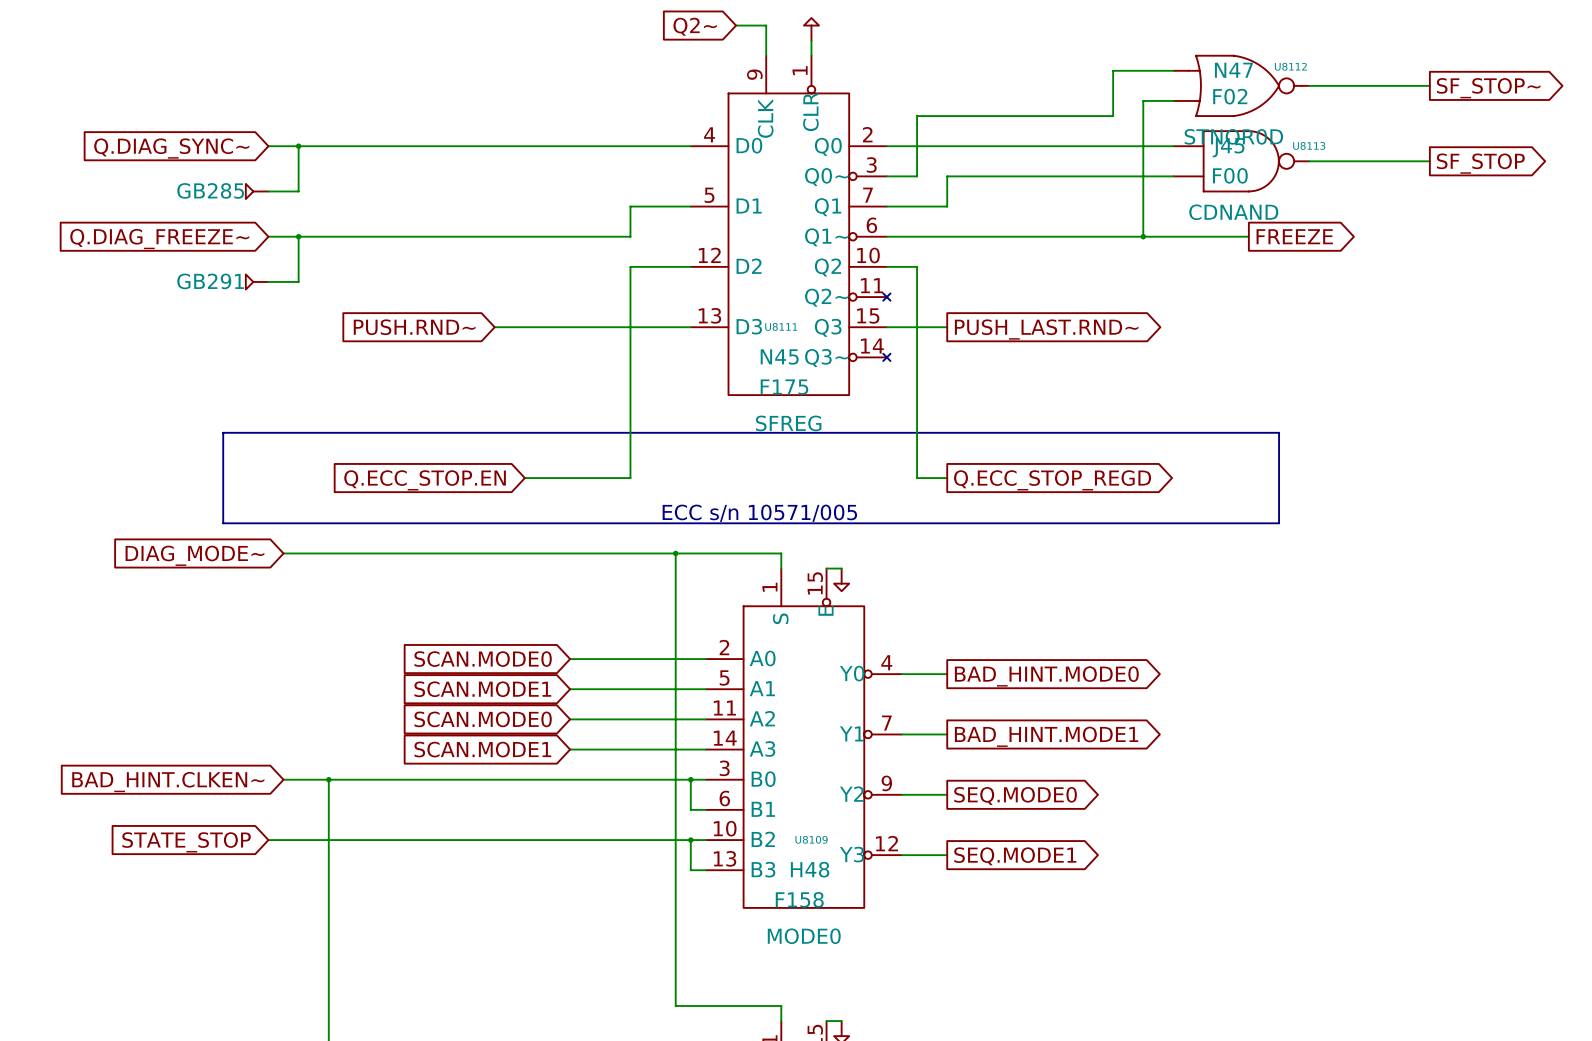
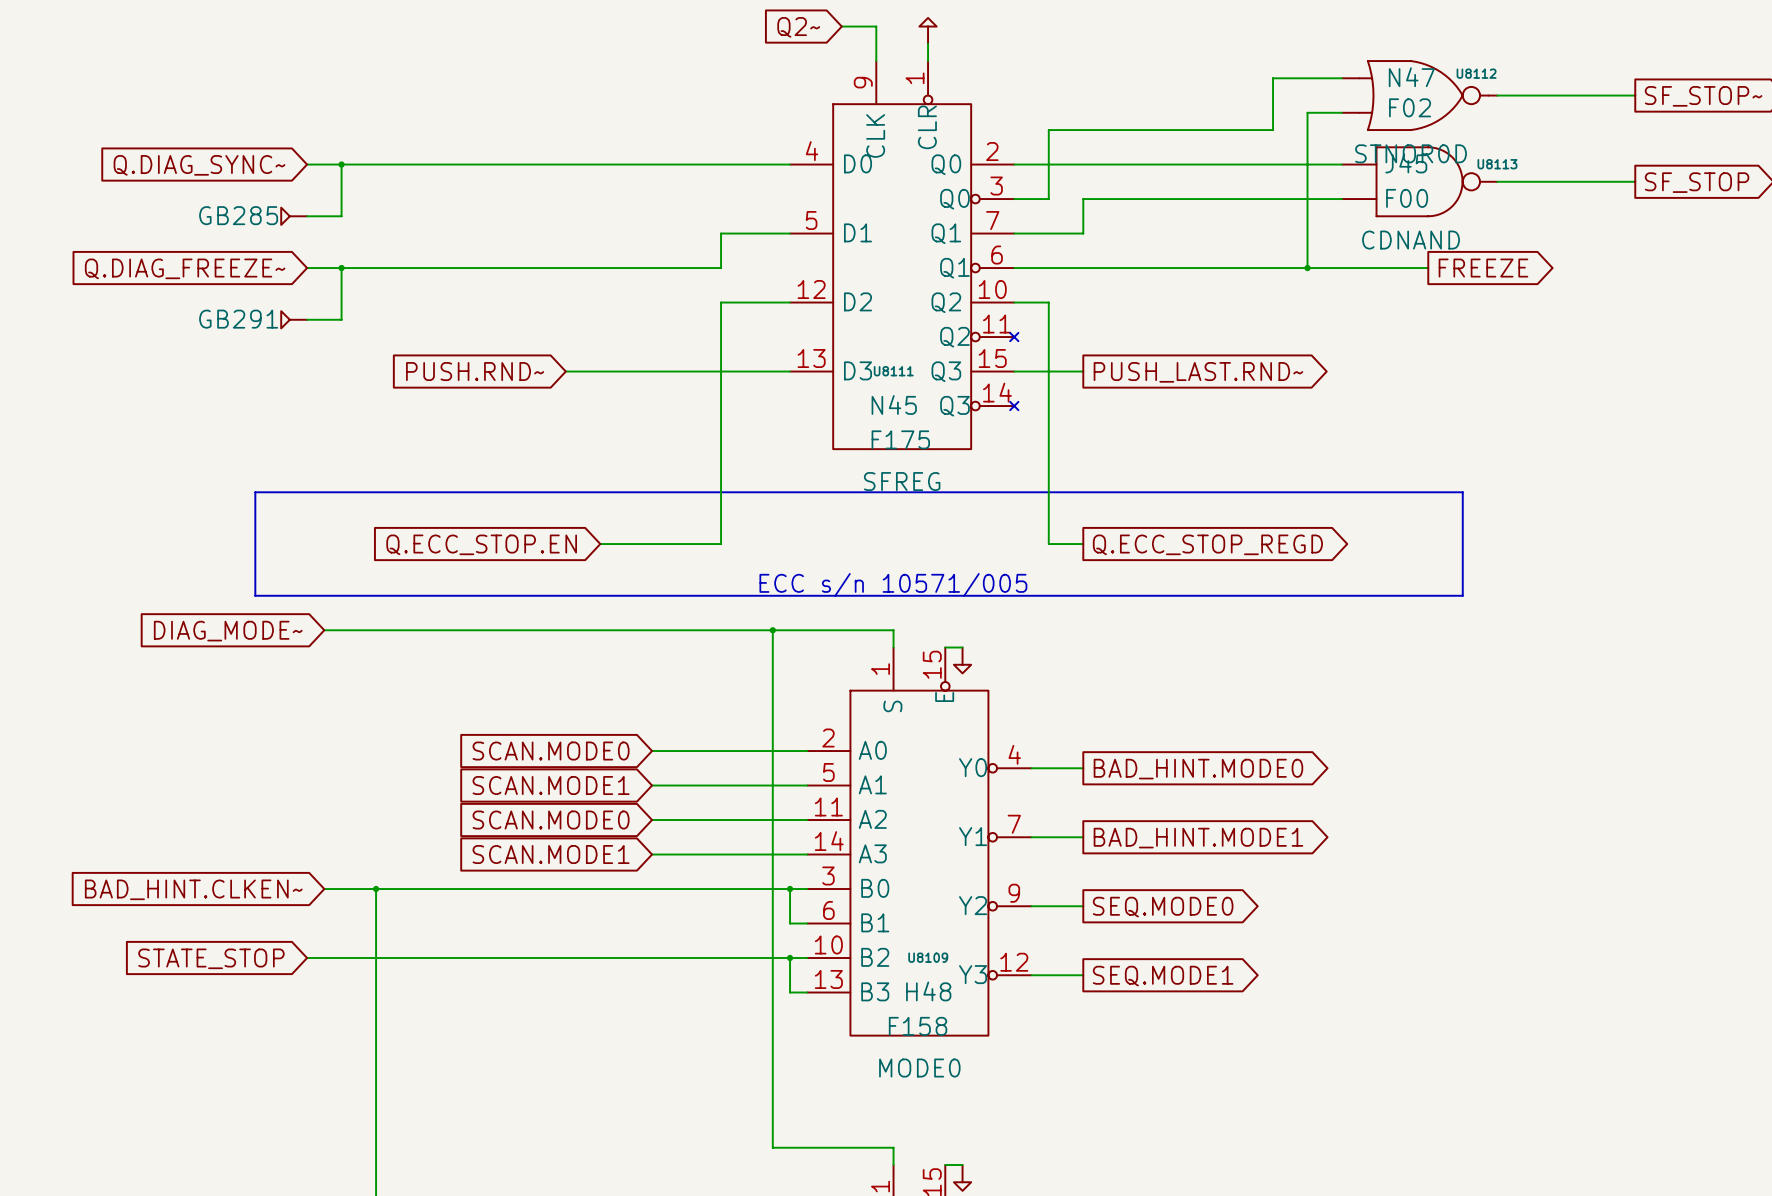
U8111 pin name: Q0~ (826, 177) -> Q0 (954, 199)
U8111 pin name: Q1~ (826, 237) -> Q1 (954, 268)
U8111 pin name: Q2~ (826, 297) -> Q2 (954, 337)
U8111 pin name: Q3~ (826, 358) -> Q3 (954, 406)

